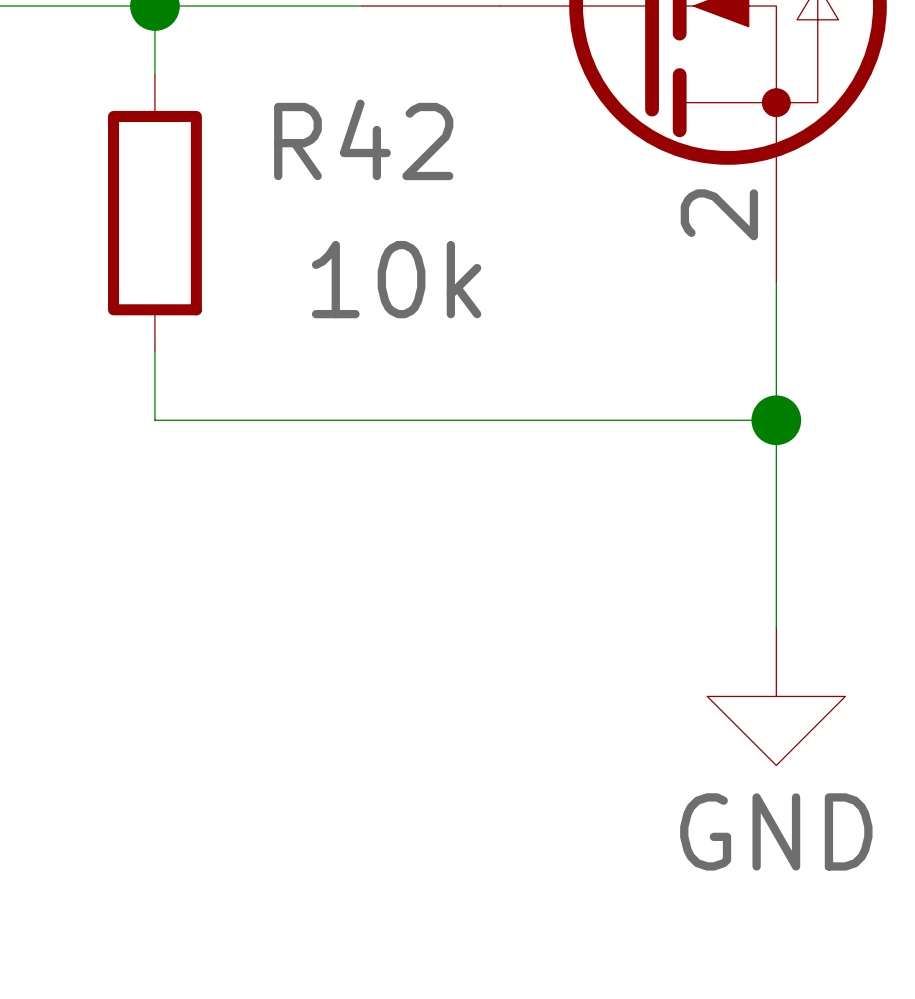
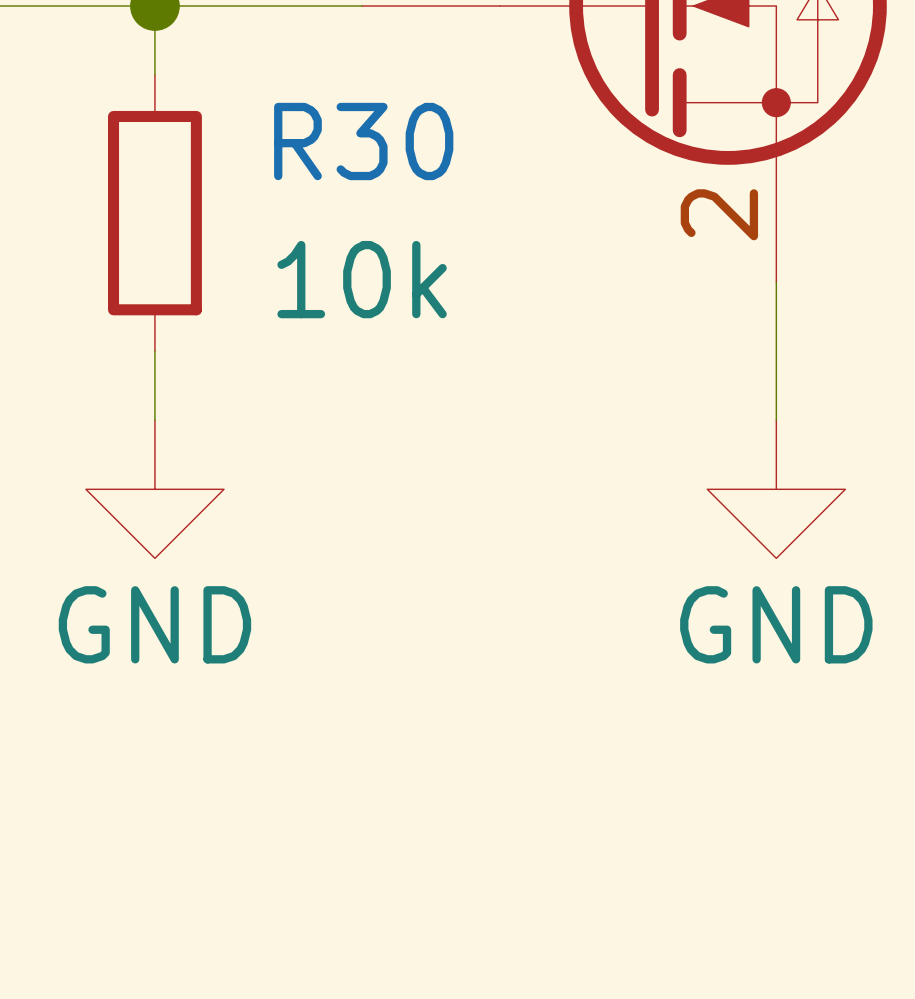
R42 name: R42 (363, 139) -> R30 (363, 141)
R42 value position: 10k (396, 279) -> 10k (362, 279)
wire: (154, 420) (776, 420) (776, 627) -> none
junction: (776, 420) -> none
power symbol: none -> GND (154, 489)
power symbol position: GND (776, 696) -> GND (776, 489)

